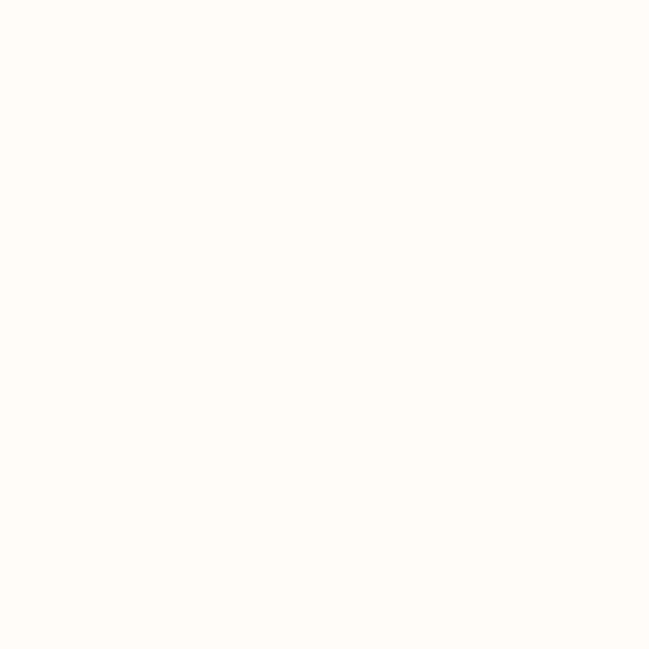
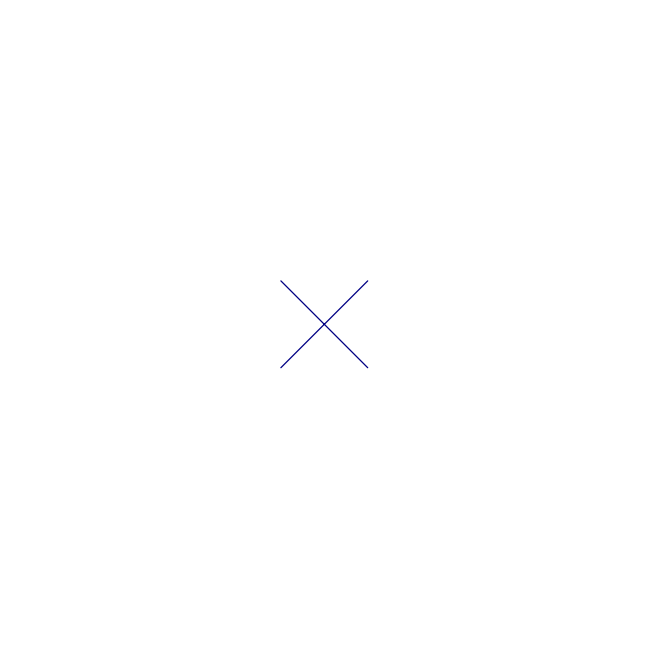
no-connect mark: none -> (324, 324)

